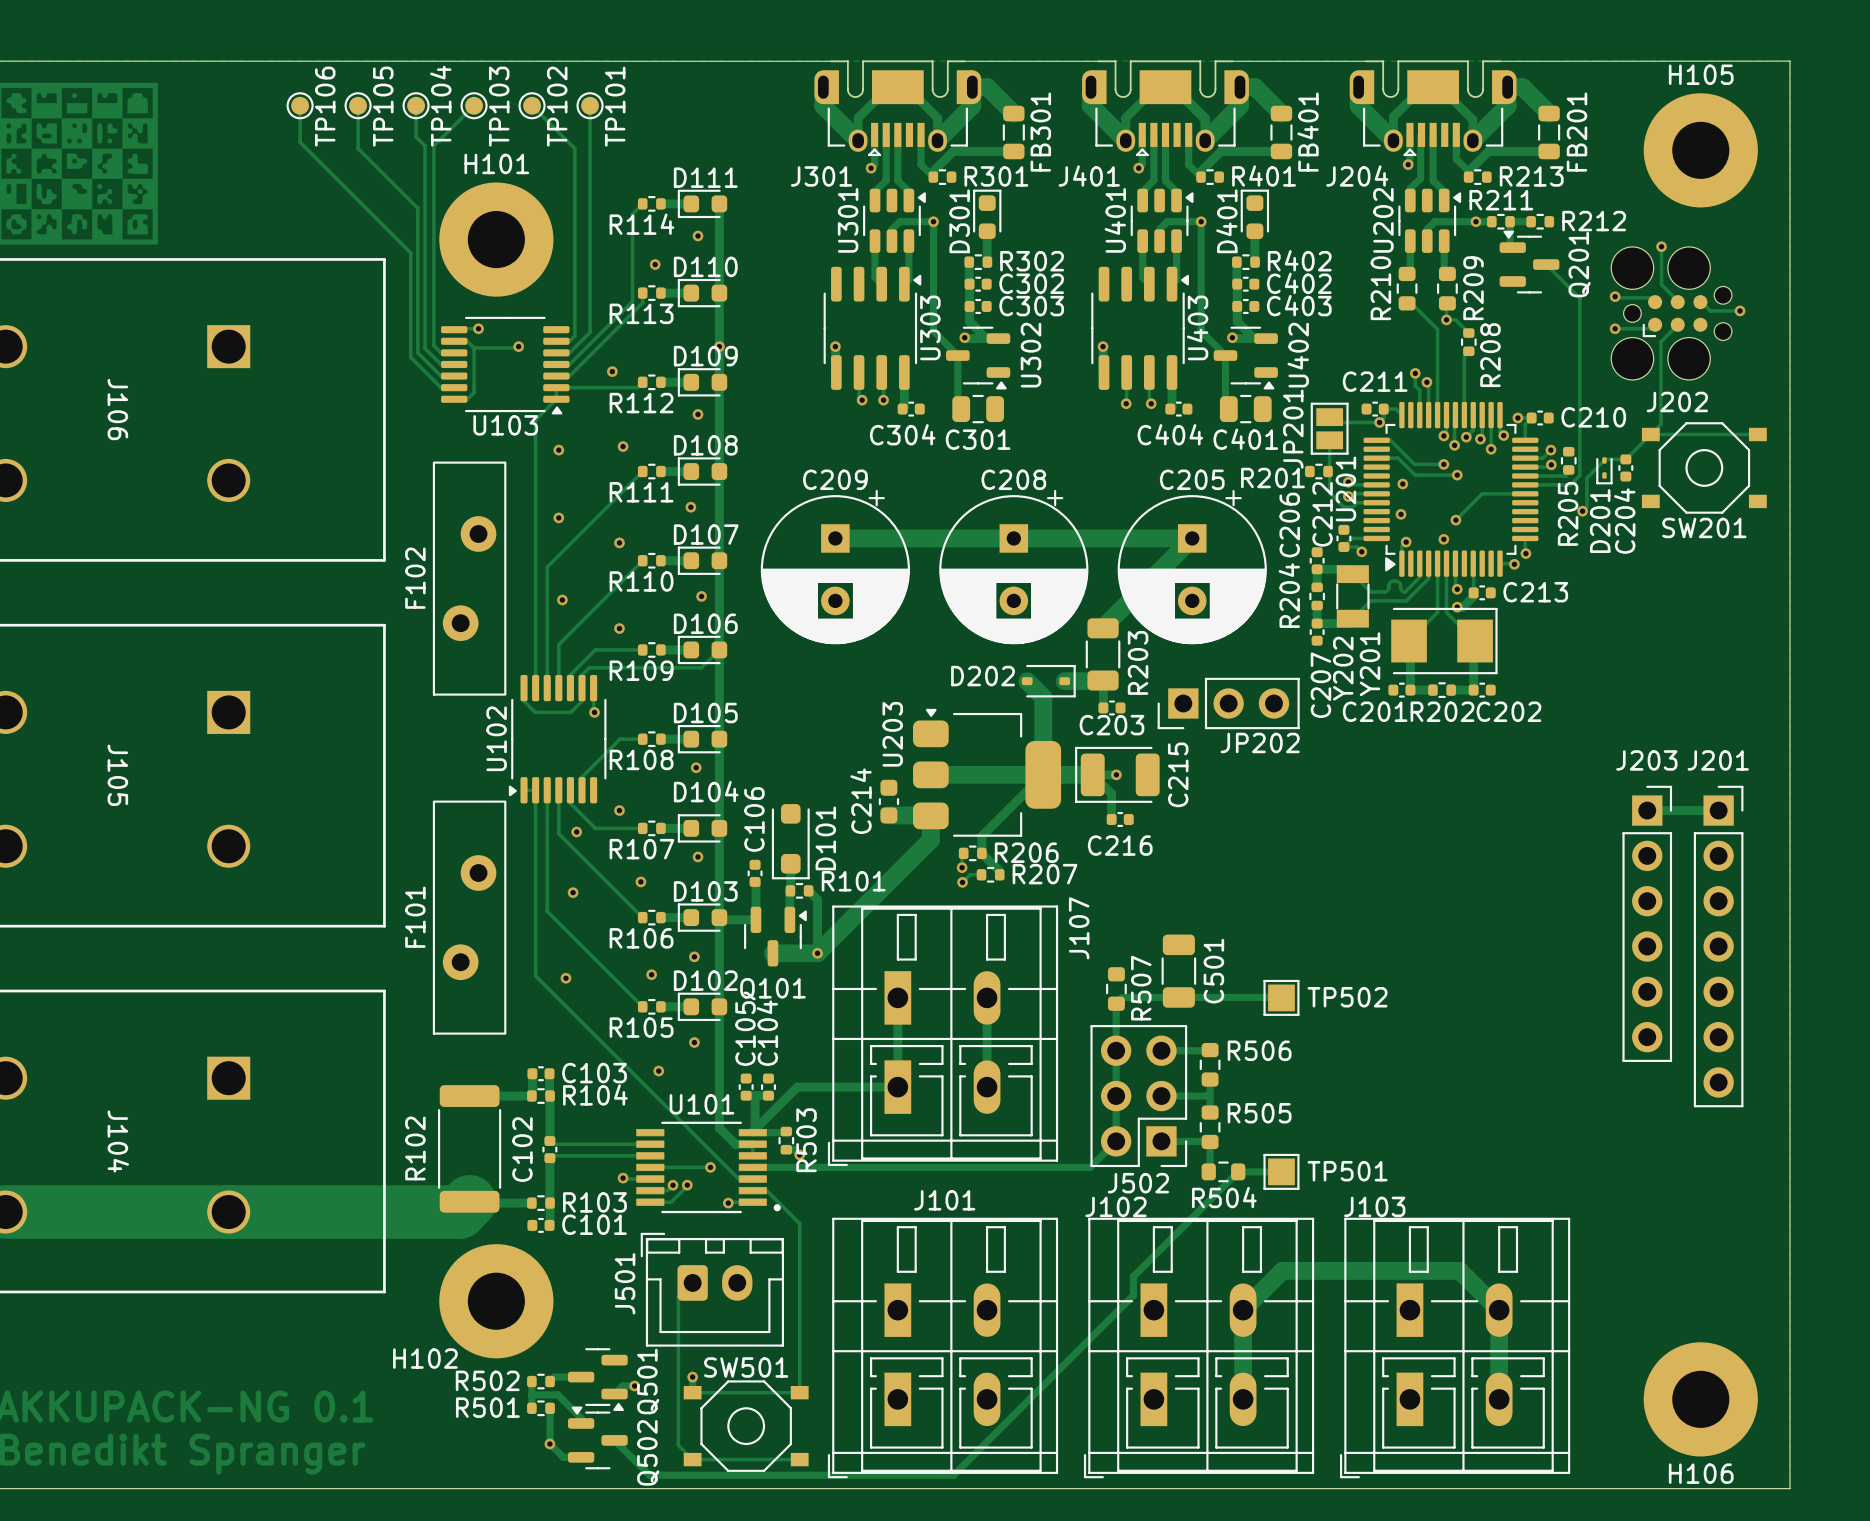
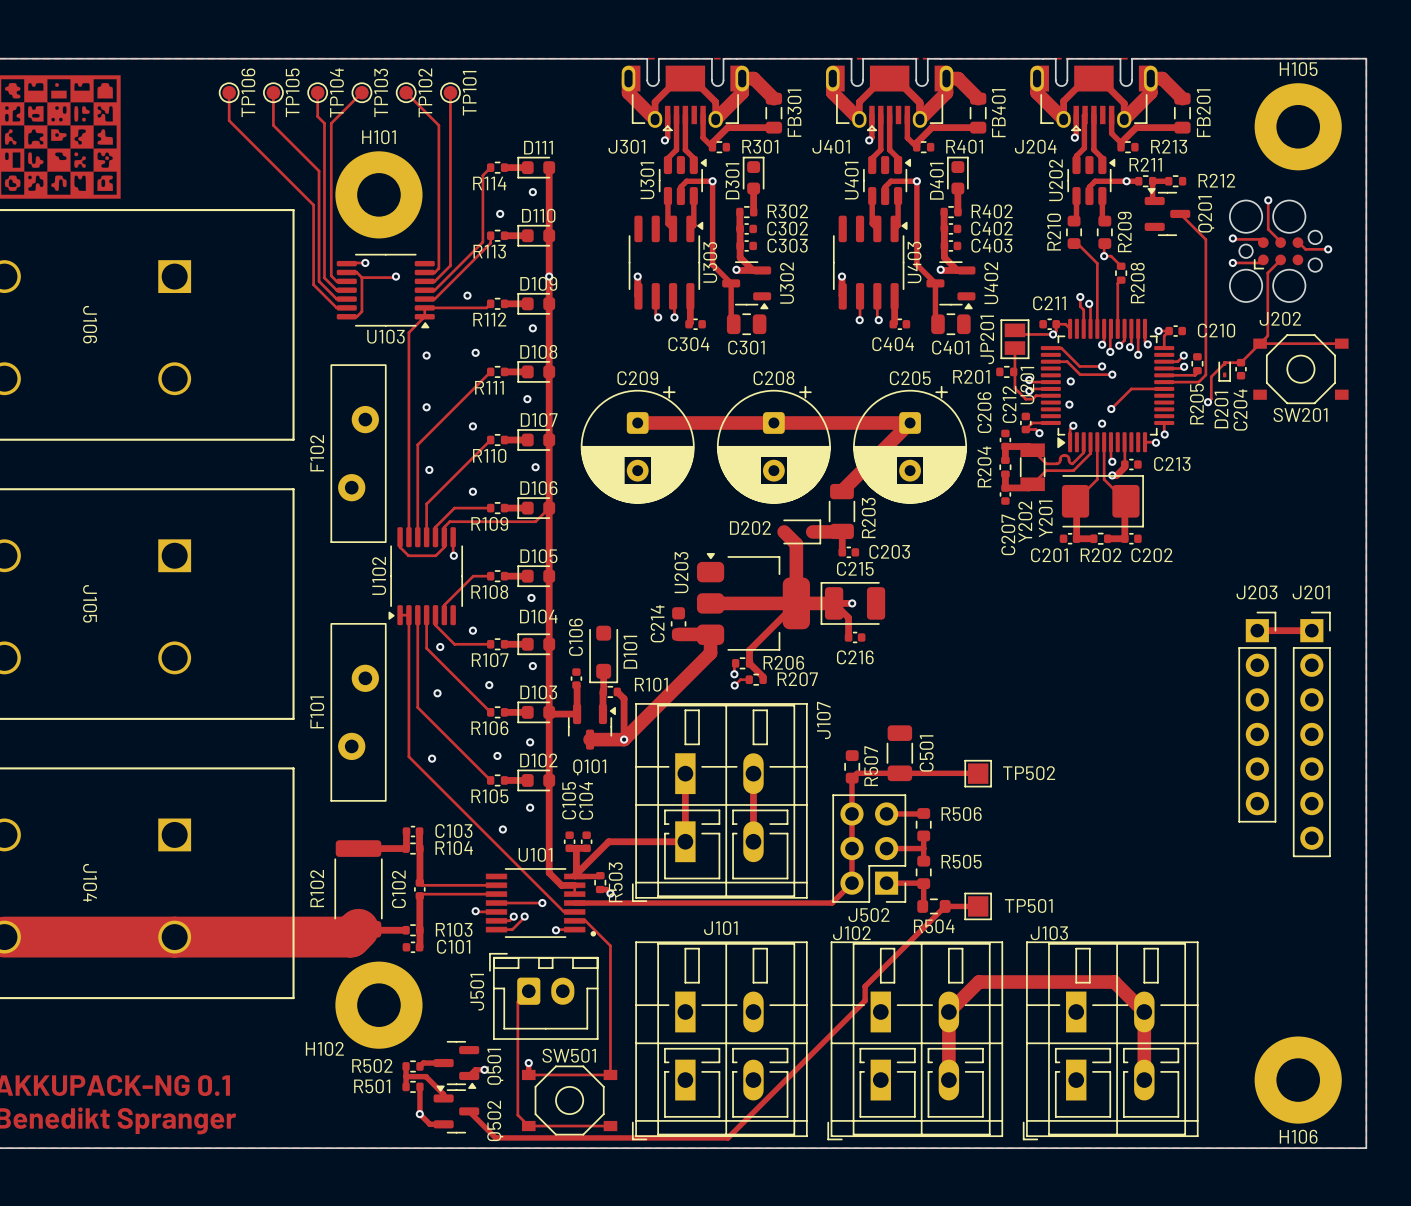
C209 footprint: [760, 489, 910, 645] -> [580, 385, 695, 504]
C208 footprint: [939, 489, 1089, 645] -> [716, 385, 831, 504]
C205 footprint: [1117, 489, 1267, 645] -> [853, 385, 968, 504]
Y201 footprint: [1391, 607, 1498, 675] -> [1061, 475, 1144, 528]
JP202: (1228, 703) -> none
C203 name position: C203 (1111, 725) -> C203 (889, 551)
C215 name rotation: 0° (1178, 774) -> 90° clockwise (855, 568)

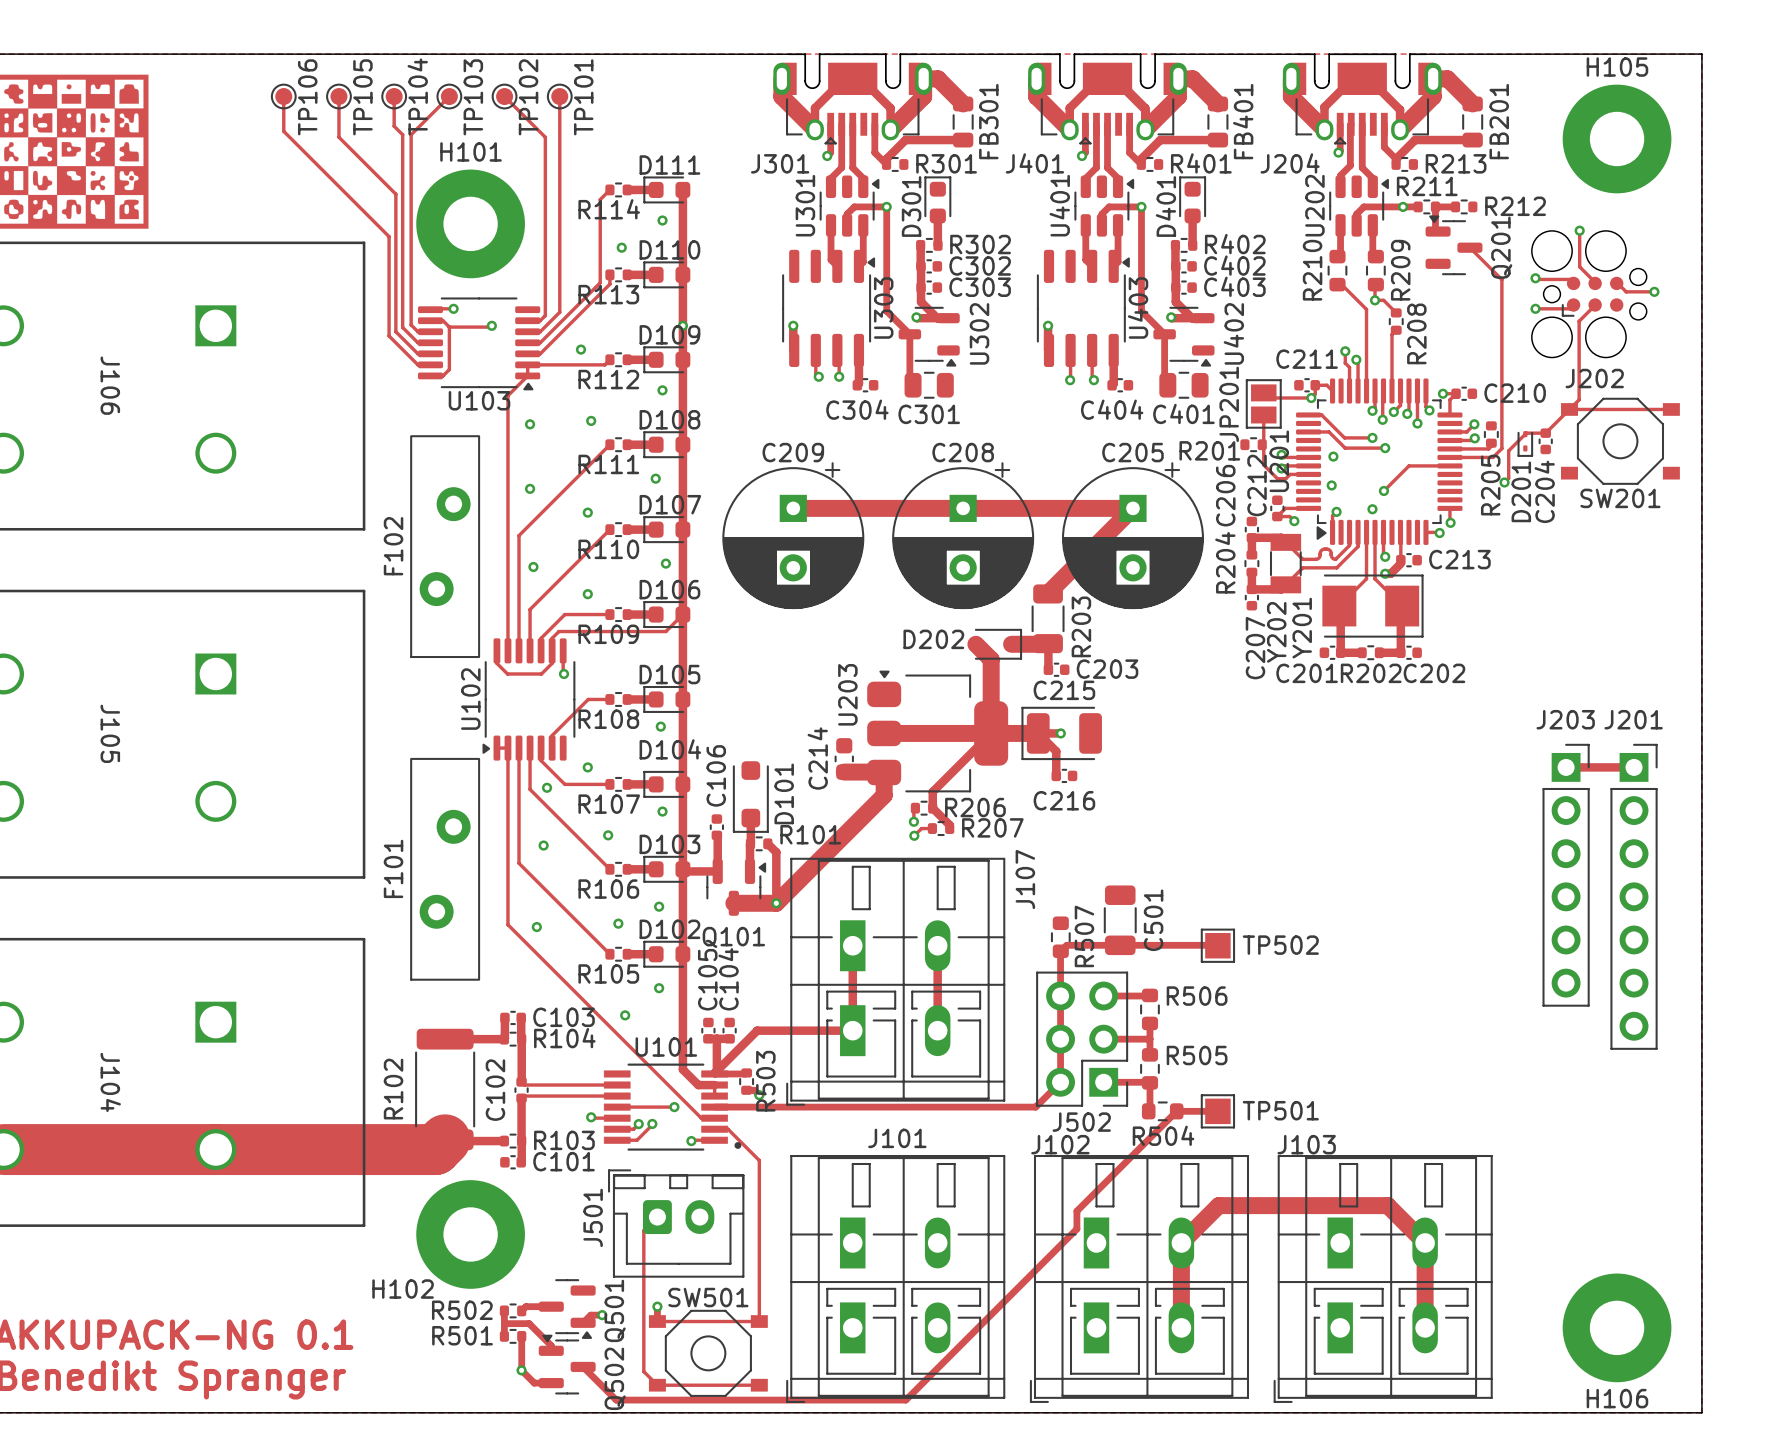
C209 footprint: [580, 385, 695, 504] -> [722, 462, 865, 610]
C208 footprint: [716, 385, 831, 504] -> [892, 462, 1035, 610]
C205 footprint: [853, 385, 968, 504] -> [1062, 462, 1204, 610]
Y201 footprint: [1061, 475, 1144, 528] -> [1322, 574, 1424, 638]

